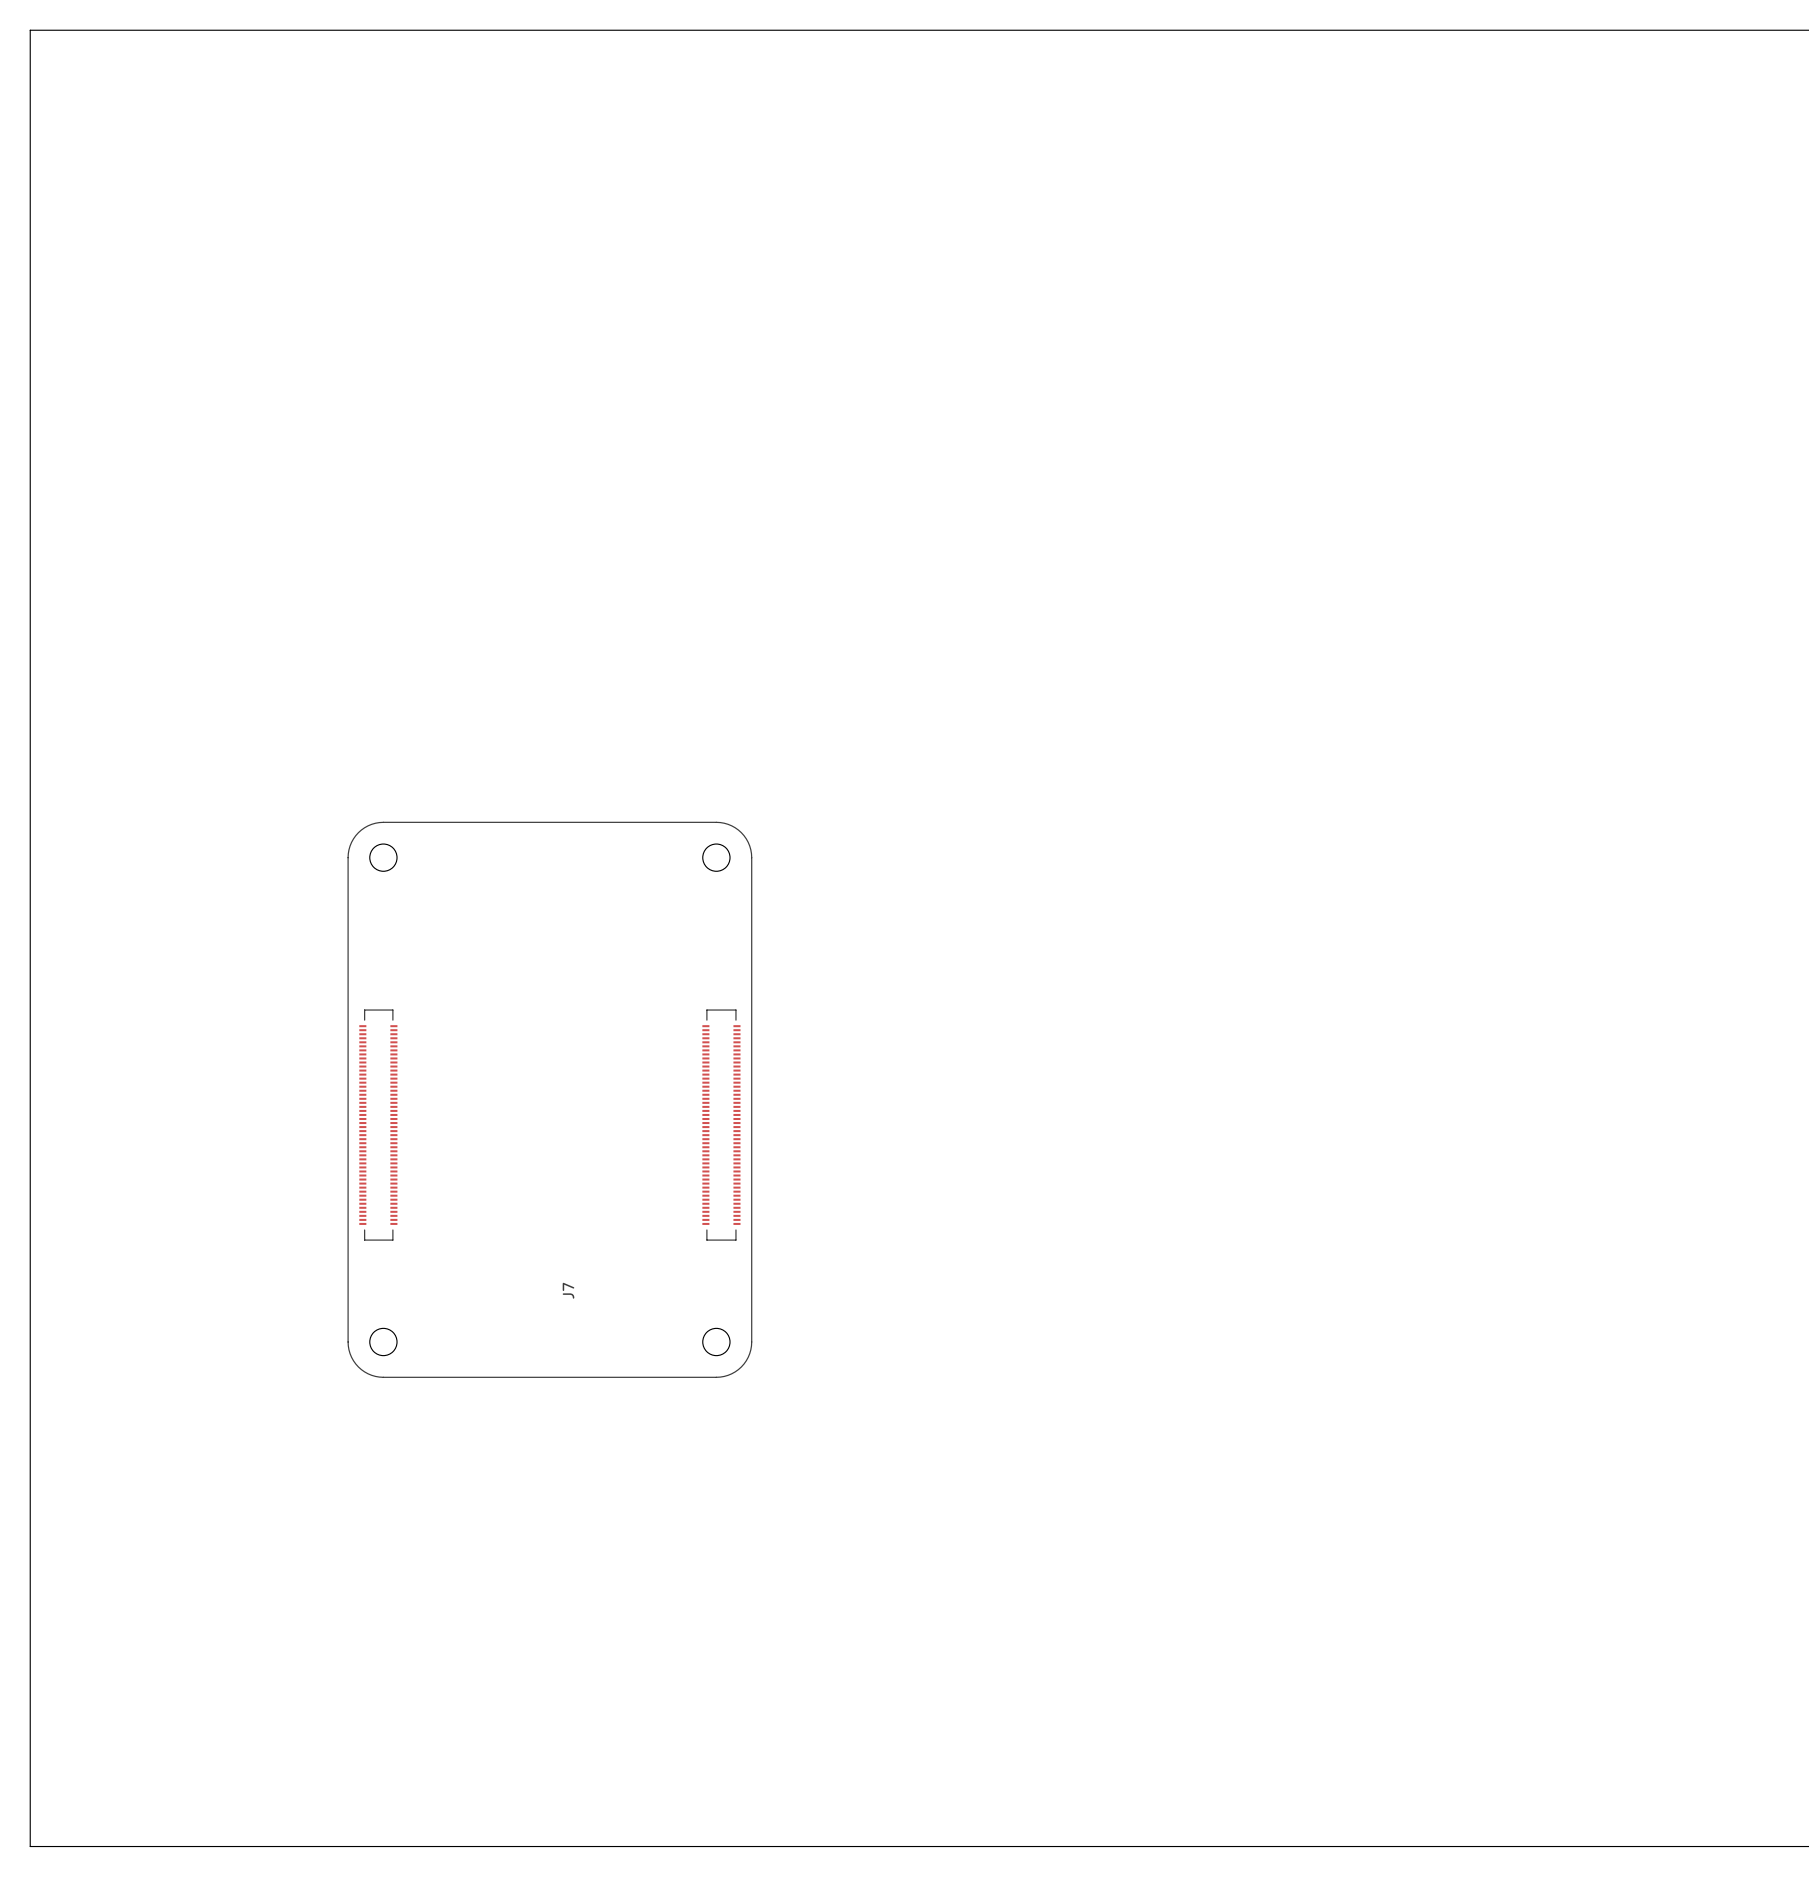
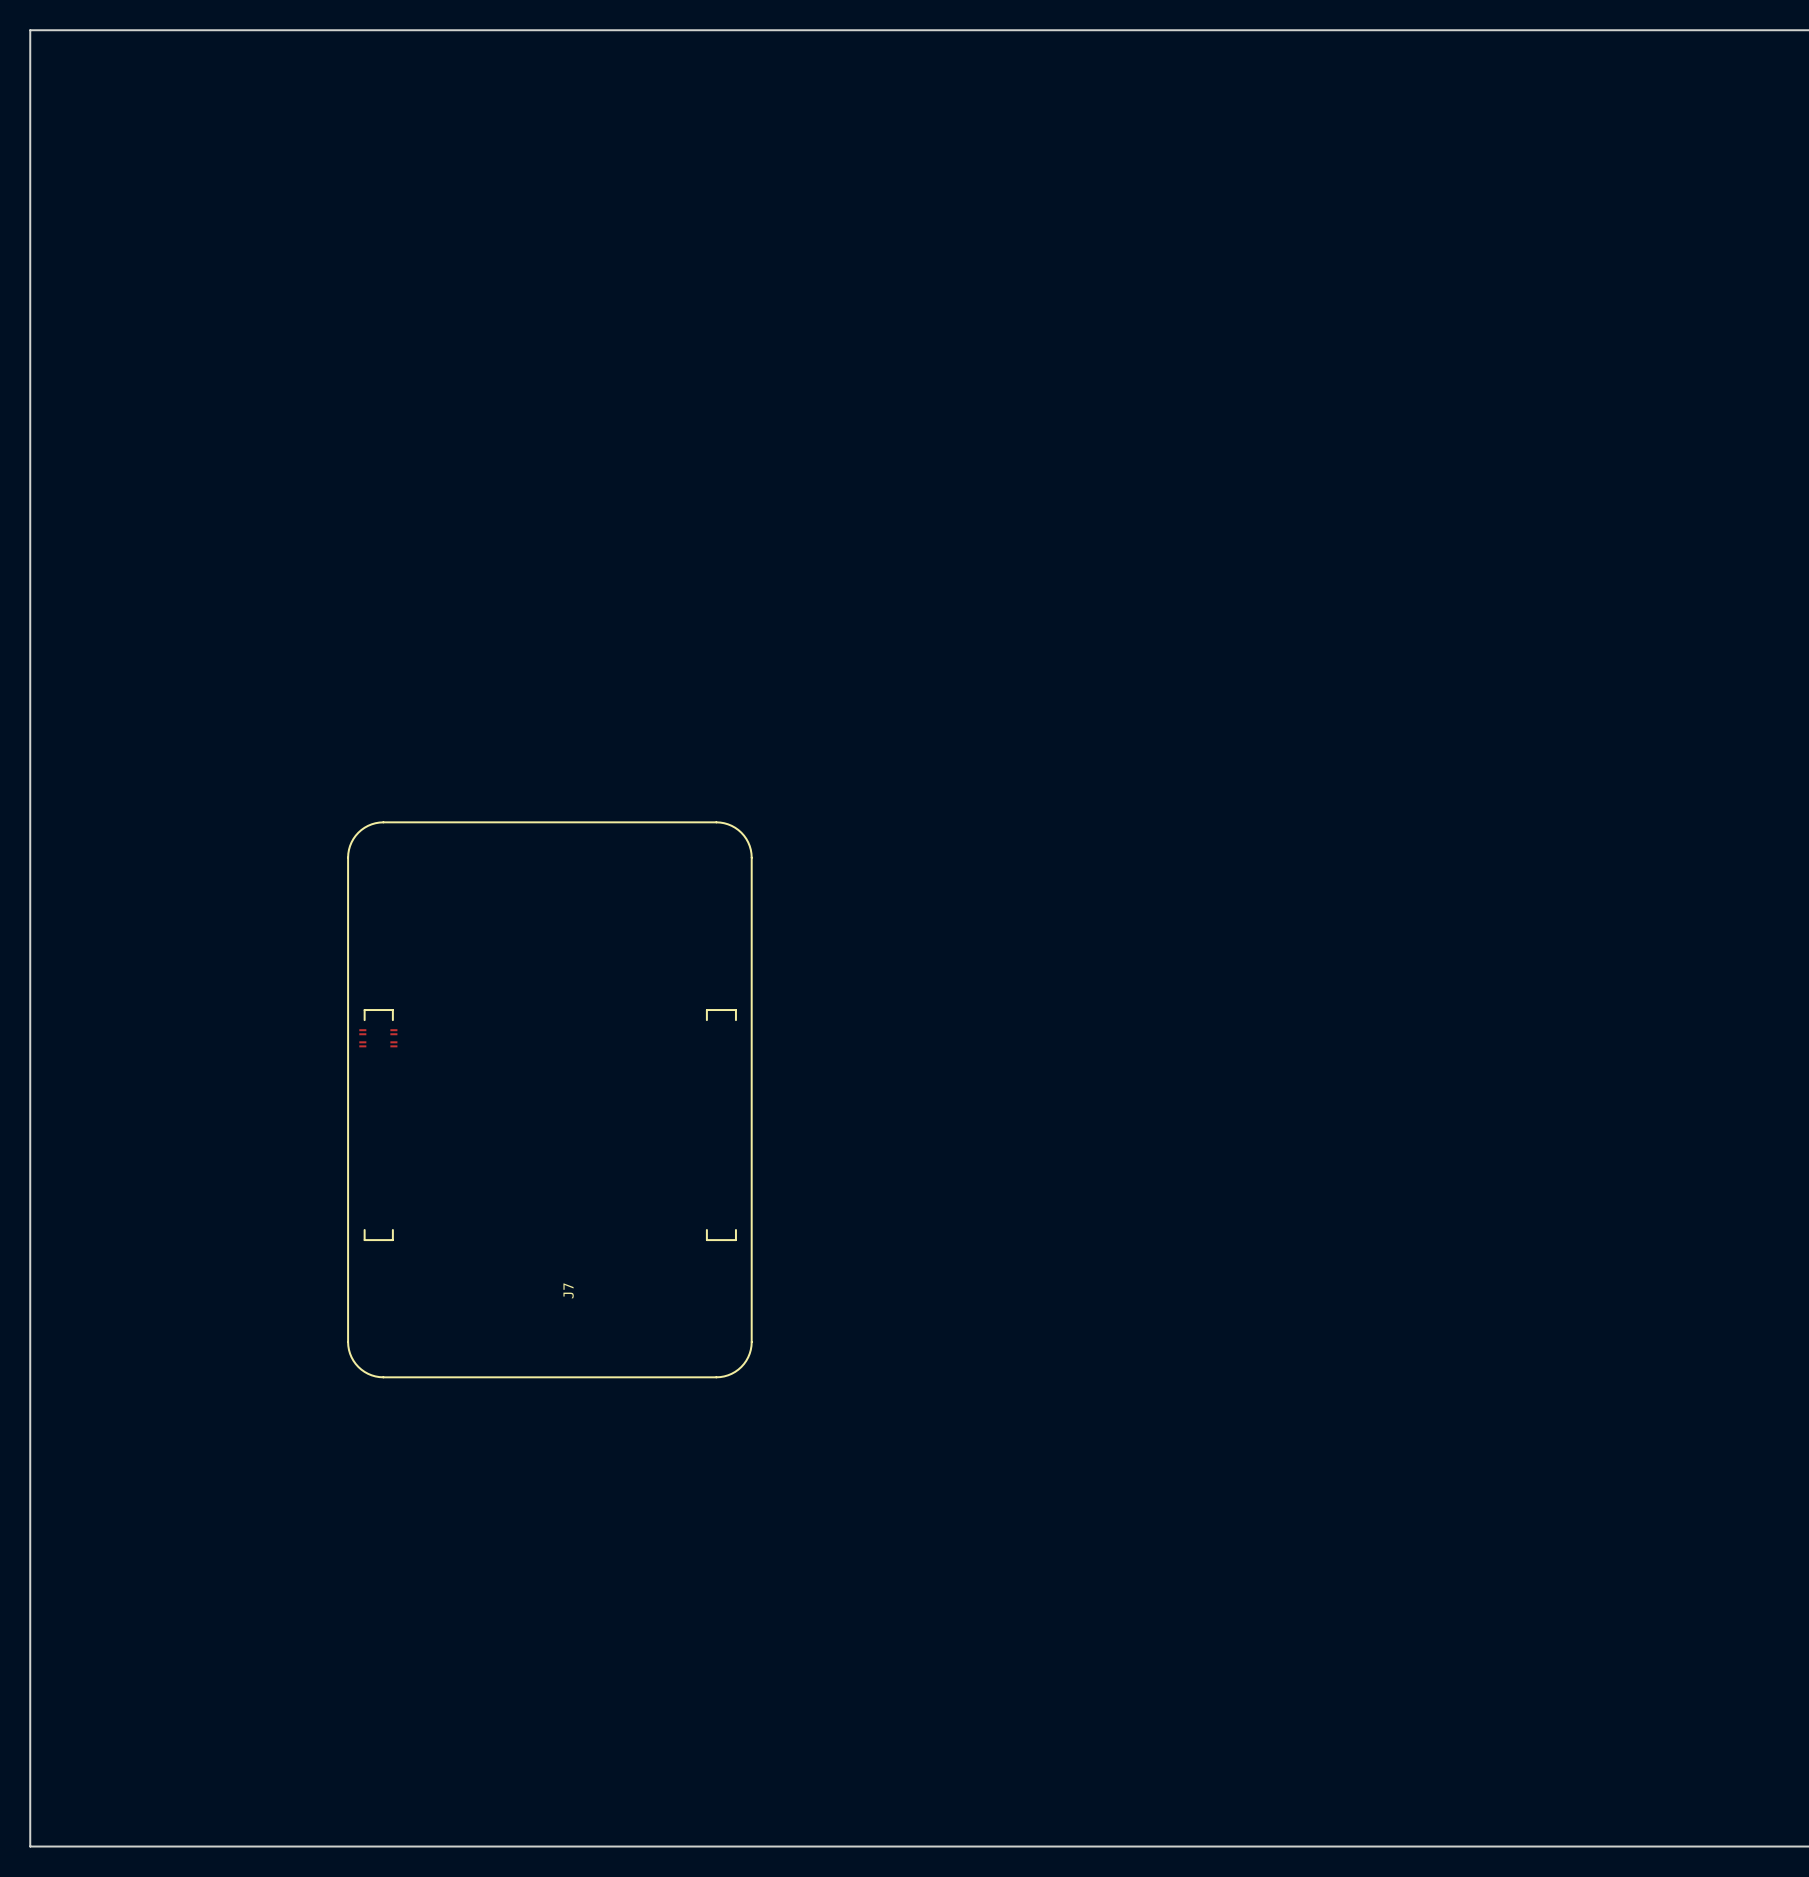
J7 footprint: [347, 821, 753, 1378] -> [347, 821, 753, 1378]

